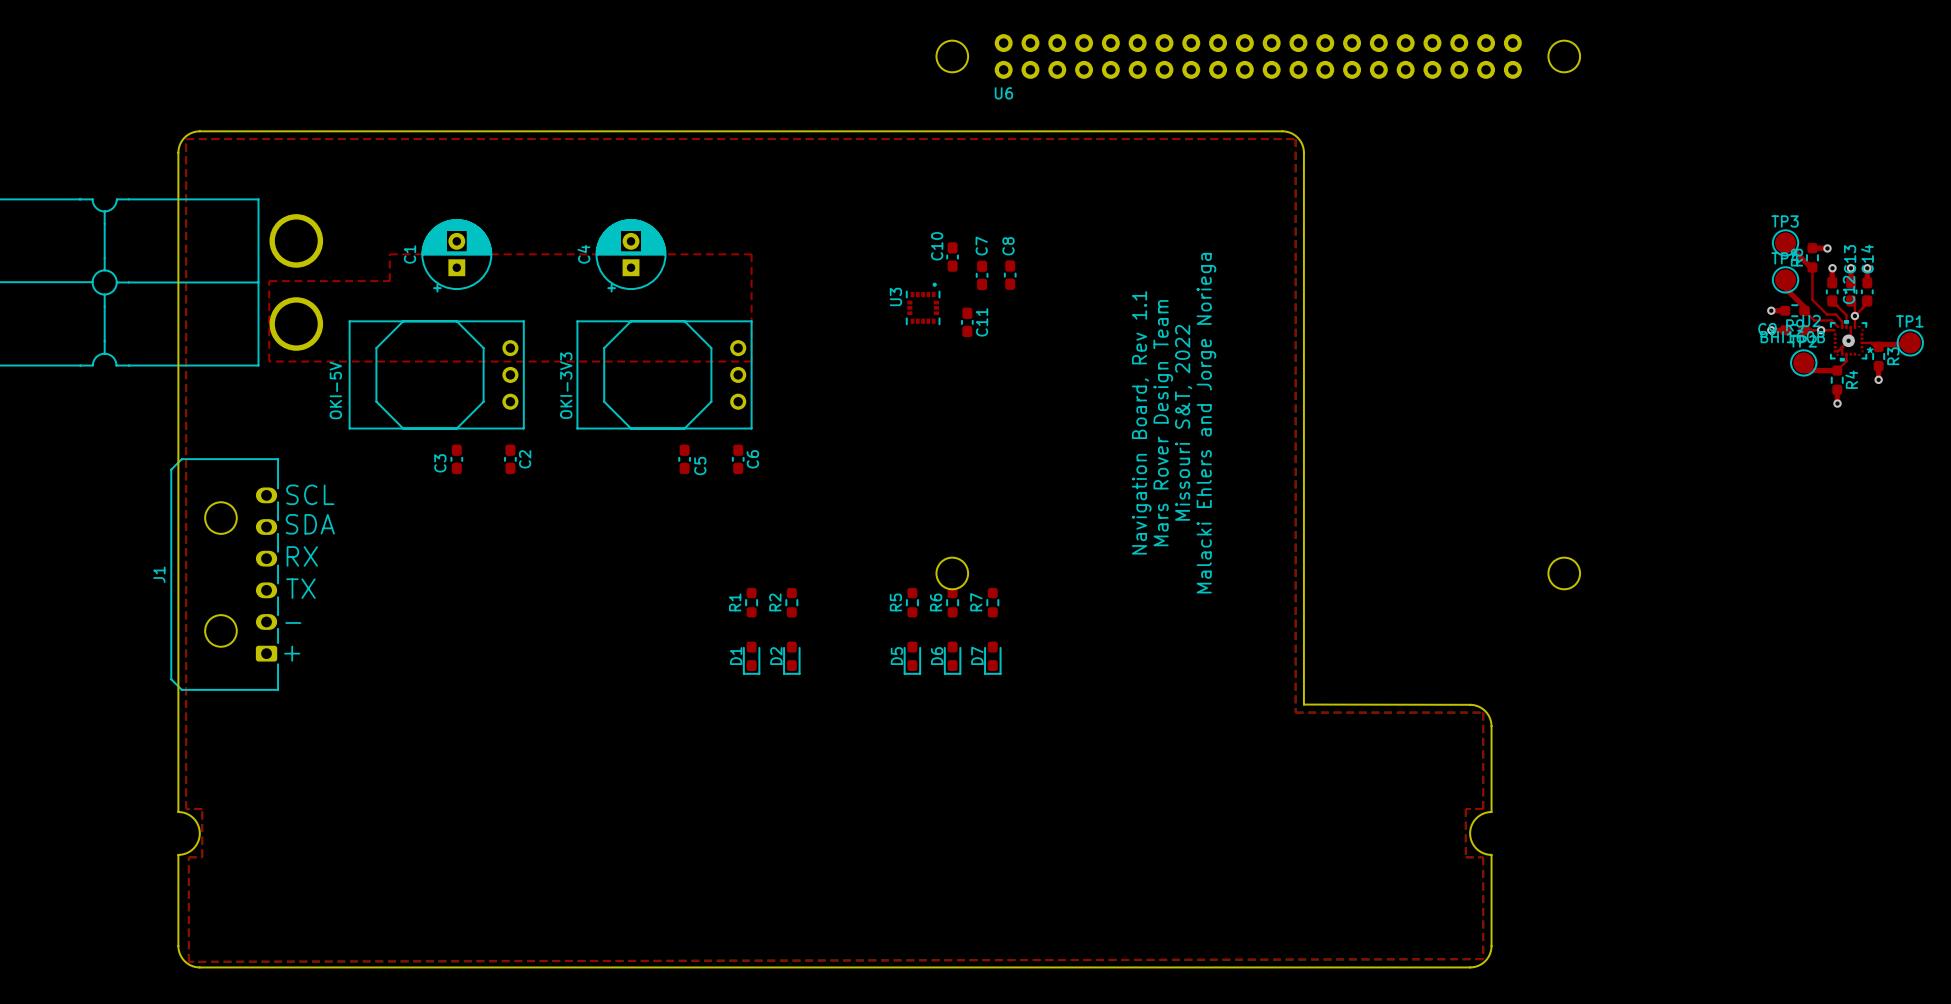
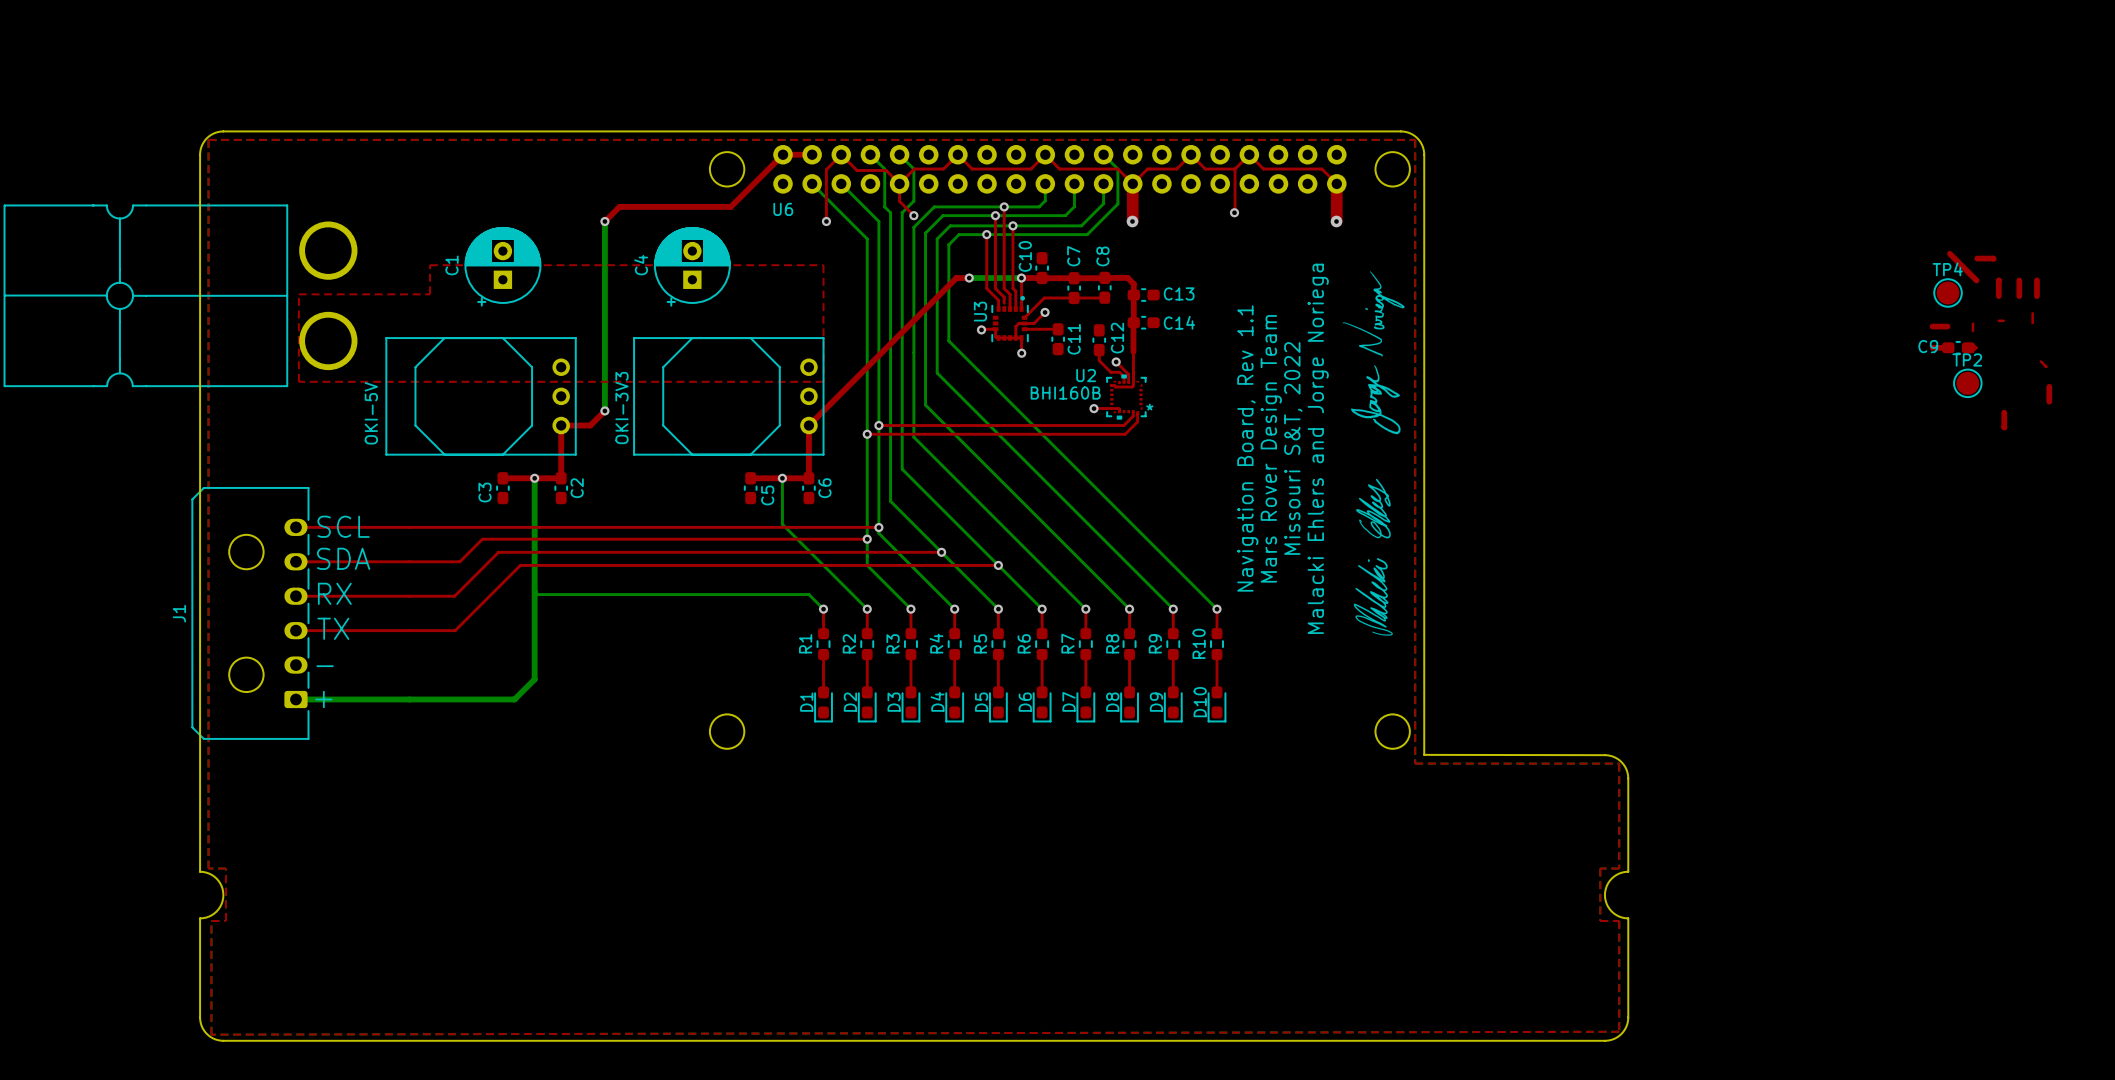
top track: none -> (812, 154) (783, 154) (730, 206) (619, 206) (604, 221)
bottom track: none -> (870, 154) (884, 169) (884, 206) (890, 212) (890, 501) (998, 609)
bottom track: none -> (899, 154) (913, 169) (913, 201) (902, 212) (902, 469) (1042, 609)
bottom track: none -> (1103, 154) (1117, 169) (1117, 204) (1087, 234) (959, 234) (948, 244) (948, 340) (1217, 609)
top track: none -> (1235, 169) (1249, 154) (1263, 169) (1321, 169) (1336, 183) (1336, 221)
top track: none -> (1235, 169) (1205, 169) (1191, 154) (1176, 169) (1147, 169) (1132, 183)
top track: none -> (1235, 169) (1234, 212)
bottom track: none -> (812, 183) (867, 238) (867, 565) (910, 609)
bottom track: none -> (841, 183) (878, 221) (878, 533) (954, 609)
top track: none -> (899, 183) (914, 169) (943, 169) (957, 154) (972, 169) (1031, 169) (1045, 154) (1059, 169) (1117, 169) (1132, 183)
top track: none -> (899, 183) (899, 201) (913, 215)
top track: none -> (899, 183) (886, 170) (857, 170) (841, 154) (826, 169) (826, 221)
bottom track: none -> (1045, 183) (1045, 200) (1039, 206) (934, 206) (913, 227) (913, 437) (1085, 609)
bottom track: none -> (1074, 183) (1074, 206) (1065, 215) (943, 215) (925, 233) (925, 405) (1129, 609)
bottom track: none -> (1103, 183) (1103, 203) (1081, 225) (950, 225) (937, 238) (937, 373) (1173, 609)
top track: none -> (1132, 183) (1132, 221)
top track: none -> (1004, 206) (1004, 288) (1010, 294) (1010, 309)
via: none -> (1004, 206)
via: none -> (1234, 212)
via: none -> (913, 215)
top track: none -> (995, 215) (995, 288) (1004, 297) (1004, 303)
via: none -> (995, 215)
bottom track: none -> (604, 221) (604, 410)
via: none -> (604, 221)
via: none -> (826, 221)
via: none -> (1132, 221)
via: none -> (1336, 221)
top track: none -> (1012, 225) (1012, 288) (1015, 291) (1015, 309)
via: none -> (1012, 225)
top track: none -> (986, 234) (986, 288) (998, 300) (998, 309)
via: none -> (986, 234)
TP3: (1785, 242) -> none
via: (1827, 248) -> none
R8 position: (1812, 257) -> (1129, 644)
drawing: none -> [1342, 271, 1405, 435]
top track: none -> (1104, 277) (1127, 277) (1133, 283) (1133, 385) (1111, 385)
top track: none -> (969, 278) (956, 278) (808, 425) (808, 478) (750, 478)
bottom track: none -> (969, 278) (1021, 278)
via: none -> (969, 278)
top track: none -> (1021, 278) (1104, 278)
top track: none -> (1021, 278) (1021, 309)
via: none -> (1021, 278)
top track: (1812, 267) (1812, 299) (1827, 314) (1836, 314) (1842, 321) (1842, 327) -> none
via: (1832, 268) -> none
via: (1850, 268) -> none
via: (1867, 268) -> none
top track: (1785, 279) (1785, 288) (1804, 307) (1804, 310) (1814, 320) (1831, 320) (1837, 326) -> none
top track: none -> (1104, 298) (1044, 298) (1024, 317)
C12 position: (1832, 291) -> (1099, 340)
C13 rotation: 0° (1851, 291) -> 90° clockwise (1143, 295)
C13 position: (1851, 291) -> (1143, 295)
C14 rotation: 0° (1867, 291) -> 90° clockwise (1143, 322)
C14 position: (1867, 291) -> (1143, 322)
top track: none -> (1045, 312) (1033, 323) (1018, 323) (1015, 326) (1015, 337)
via: none -> (1045, 312)
top track: (1832, 300) (1846, 315) (1846, 327) -> none
top track: (1854, 301) (1854, 327) -> none
top track: (1866, 303) (1854, 315) -> none
via: (1771, 310) -> none
R9 rotation: 0° (1794, 310) -> 90° clockwise (1173, 644)
R9 position: (1794, 310) -> (1173, 644)
U6 position: (1258, 311) -> (1059, 446)
top track: none -> (981, 329) (995, 329) (996, 337) (1021, 337) (1021, 353)
via: none -> (981, 329)
top track: none -> (1024, 329) (1058, 329)
via: (1854, 315) -> none
top track: (1850, 327) (1850, 338) (1838, 351) (1835, 351) -> none
via: (1771, 330) -> none
via: (1821, 330) -> none
top track: (1834, 330) (1804, 330) -> none
top track: none -> (1099, 350) (1099, 360) (1110, 372) (1119, 372) (1124, 376) (1124, 382)
via: none -> (1021, 353)
U2 position: (1848, 340) -> (1126, 397)
via: (1848, 340) -> none
top track: (1861, 342) (1879, 343) -> none
TP1: (1910, 342) -> none
top track: none -> (1116, 361) (1128, 374) (1128, 382)
via: none -> (1116, 361)
top track: (1878, 344) (1906, 344) -> none
top track: (1842, 347) (1842, 354) -> none
top track: (1846, 354) (1846, 361) (1837, 370) (1804, 370) (1803, 369) -> none
R3 position: (1878, 356) -> (910, 644)
R3 name position: R3 (1893, 356) -> R3 (893, 643)
R4 name position: R4 (1851, 379) -> R4 (936, 643)
via: (1878, 379) -> none
R4 position: (1837, 380) -> (954, 644)
top track: none -> (1094, 408) (1118, 408) (1119, 411)
via: none -> (1094, 408)
top track: none -> (604, 410) (590, 425) (561, 425) (561, 478) (502, 478)
via: none -> (604, 410)
top track: none -> (1133, 411) (1133, 416) (1123, 425) (878, 425)
top track: none -> (1137, 412) (1137, 421) (1125, 434) (867, 434)
via: none -> (878, 425)
via: (1837, 403) -> none
via: none -> (867, 434)
bottom track: none -> (534, 478) (534, 679) (514, 699) (295, 699)
via: none -> (534, 478)
bottom track: none -> (782, 478) (782, 524) (867, 609)
via: none -> (782, 478)
drawing: none -> [1353, 478, 1393, 636]
top track: none -> (295, 527) (878, 527)
via: none -> (878, 527)
top track: none -> (867, 539) (482, 539) (459, 561) (295, 561)
via: none -> (867, 539)
top track: none -> (941, 552) (498, 552) (454, 596) (295, 596)
via: none -> (941, 552)
top track: none -> (998, 565) (520, 565) (455, 630) (295, 630)
via: none -> (998, 565)
bottom track: none -> (534, 591) (537, 594) (808, 594) (823, 609)
top track: none -> (823, 609) (823, 633)
via: none -> (823, 609)
top track: none -> (867, 609) (867, 633)
via: none -> (867, 609)
top track: none -> (910, 609) (910, 633)
via: none -> (910, 609)
top track: none -> (954, 609) (954, 633)
via: none -> (954, 609)
top track: none -> (998, 609) (998, 633)
via: none -> (998, 609)
top track: none -> (1042, 609) (1042, 633)
via: none -> (1042, 609)
top track: none -> (1085, 609) (1085, 633)
via: none -> (1085, 609)
top track: none -> (1129, 609) (1129, 633)
via: none -> (1129, 609)
top track: none -> (1173, 609) (1173, 633)
via: none -> (1173, 609)
top track: none -> (1217, 609) (1217, 633)
via: none -> (1217, 609)
R10: none -> (1217, 644)
top track: none -> (823, 654) (823, 692)
top track: none -> (867, 654) (867, 692)
top track: none -> (910, 654) (910, 692)
top track: none -> (954, 654) (954, 692)
top track: none -> (998, 654) (998, 692)
top track: none -> (1042, 654) (1042, 692)
top track: none -> (1085, 654) (1085, 692)
top track: none -> (1129, 654) (1129, 692)
top track: none -> (1173, 654) (1173, 692)
top track: none -> (1217, 654) (1217, 692)
D3: none -> (910, 704)
D4: none -> (954, 704)
D8: none -> (1129, 704)
D9: none -> (1173, 704)
D10: none -> (1217, 704)

